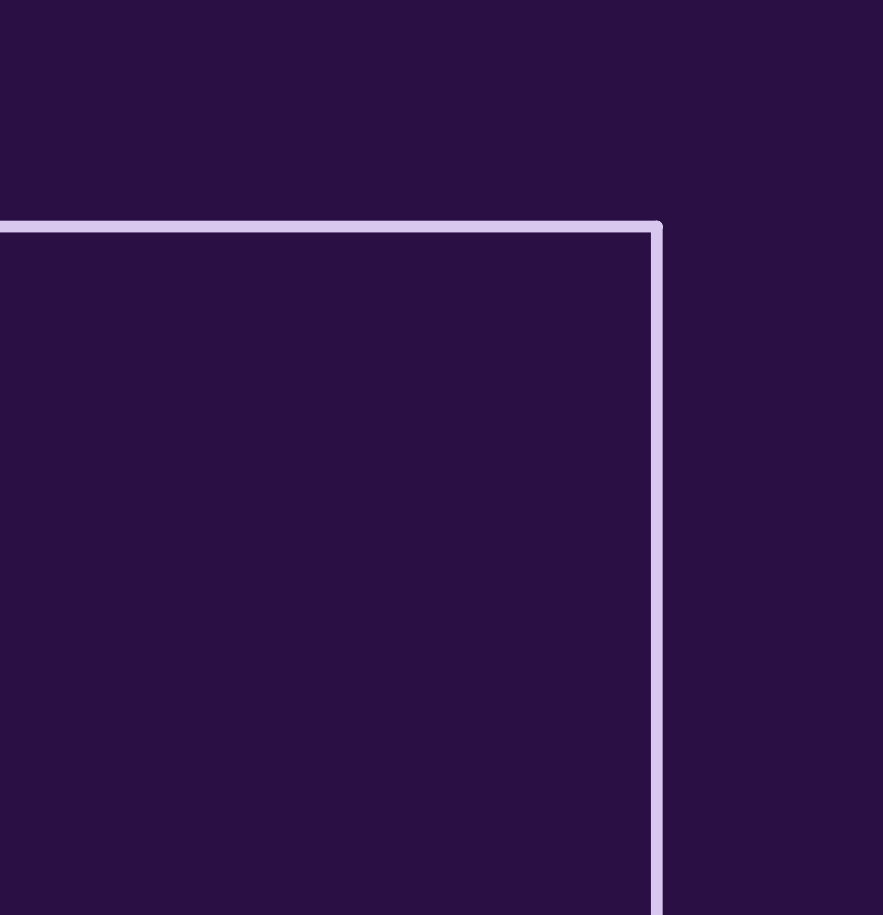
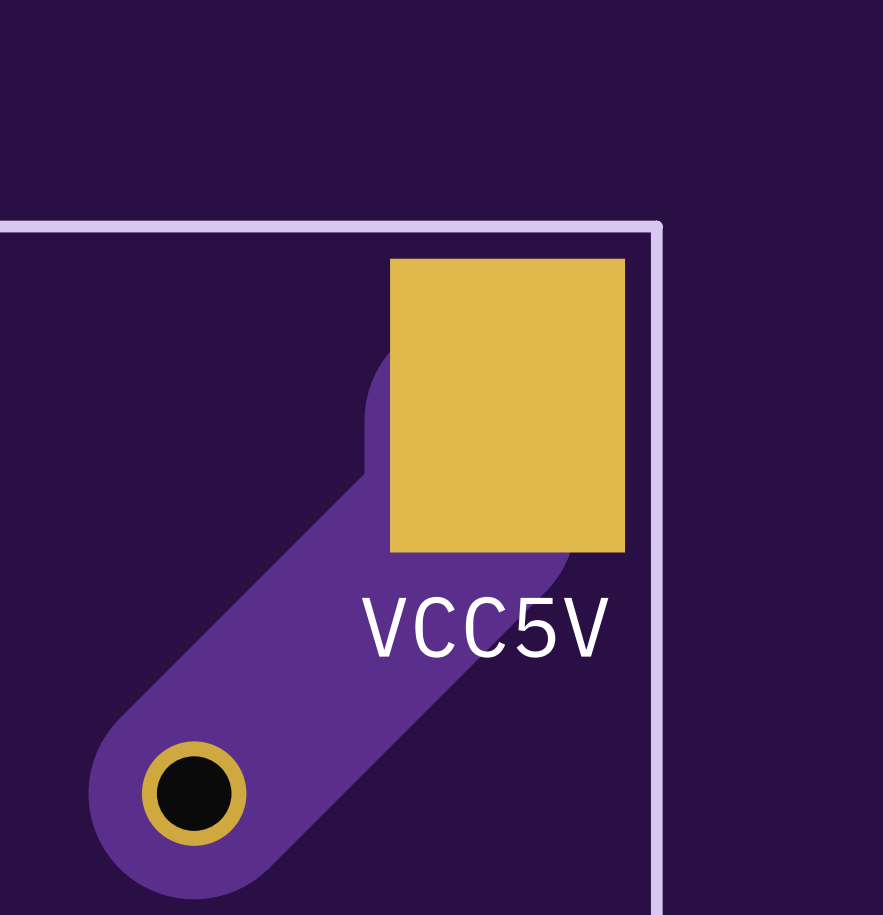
part: none -> VCC5V (507, 405)
track: none -> (470, 420) (470, 517) (194, 793)
via: none -> (194, 793)

